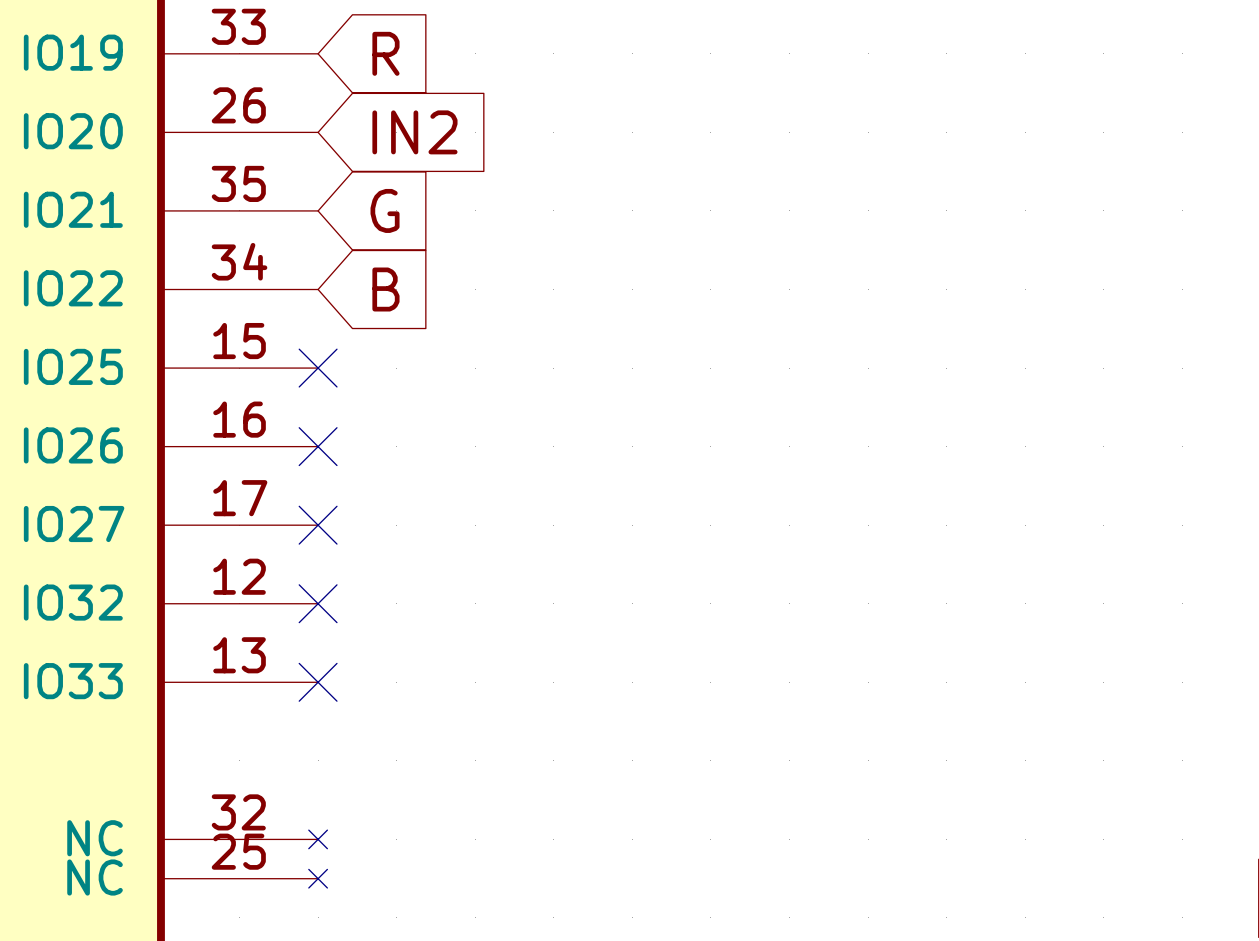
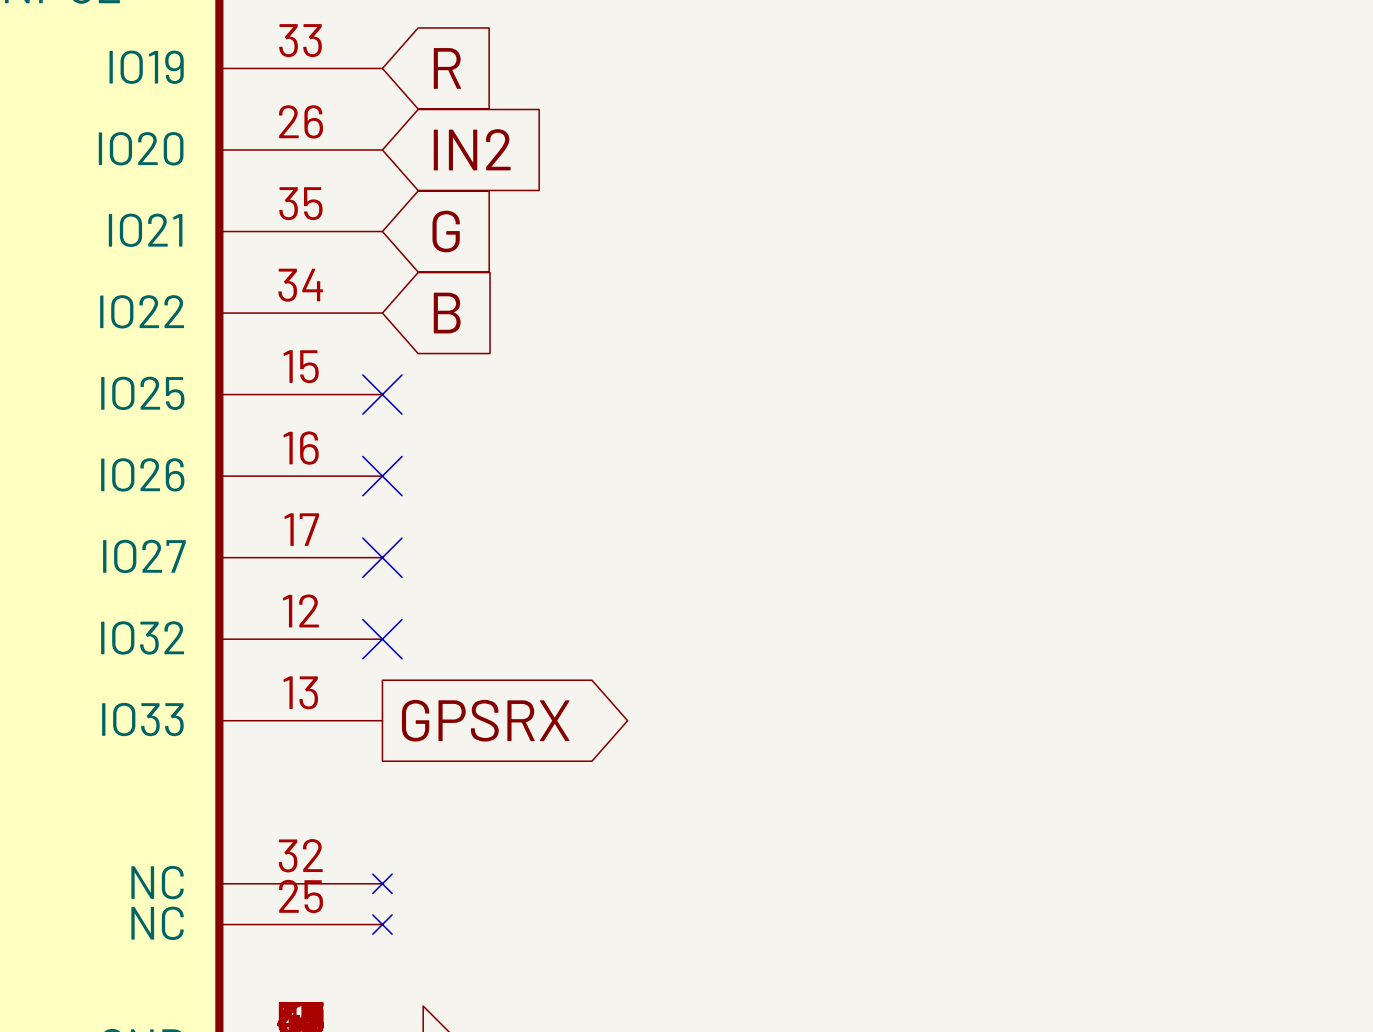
no-connect mark: (318, 682) -> none
global label: none -> GPSRX (485, 720)

